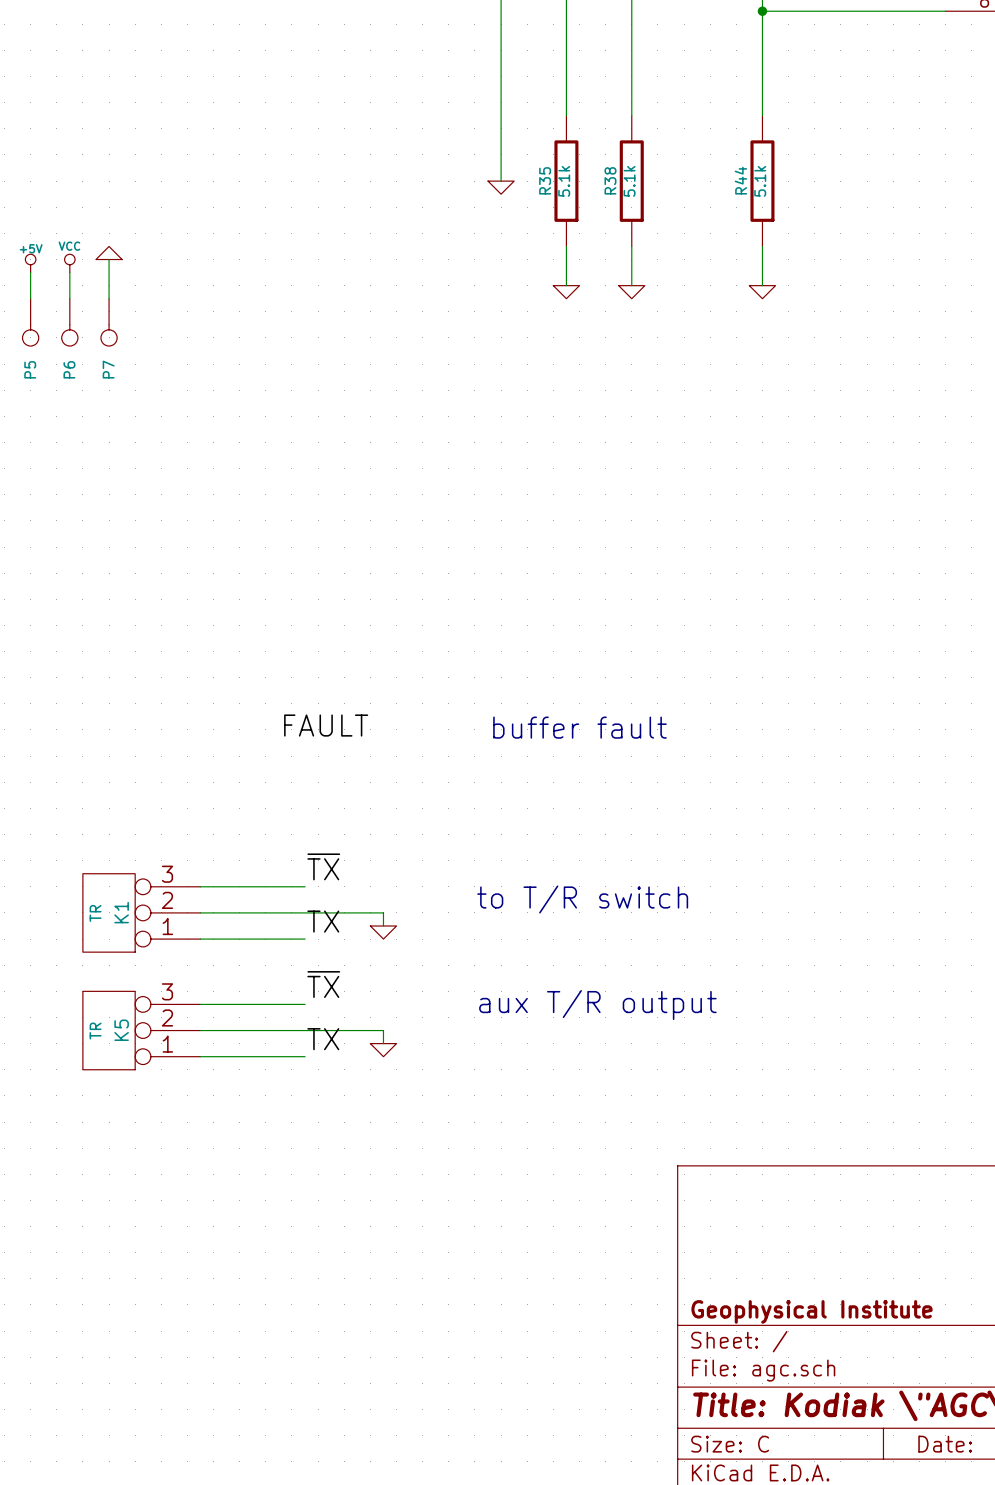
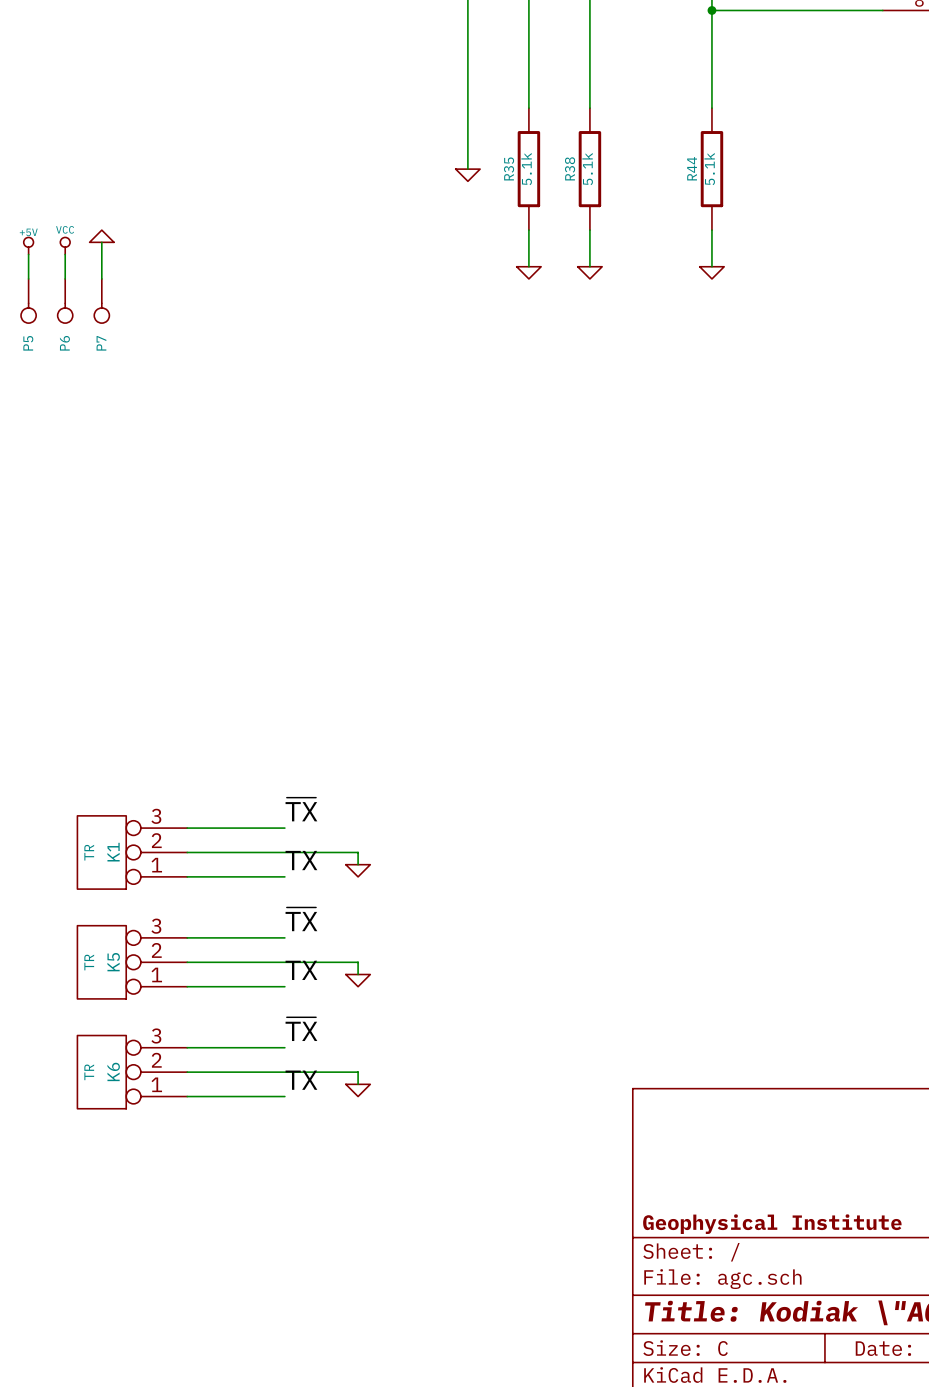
label: FAULT (326, 725) -> none
text: buffer fault (580, 727) -> none
text: to T/R switch (582, 899) -> none
text: aux T/R output (597, 1005) -> none
label: none -> ~{TX} (301, 1029)
wire: none -> (187, 1047) (284, 1047)
K6: none -> TR (132, 1072)
wire: none -> (187, 1072) (358, 1072) (358, 1084)
label: none -> TX (301, 1080)
power symbol: none -> (358, 1090)
wire: none -> (187, 1096) (284, 1096)

